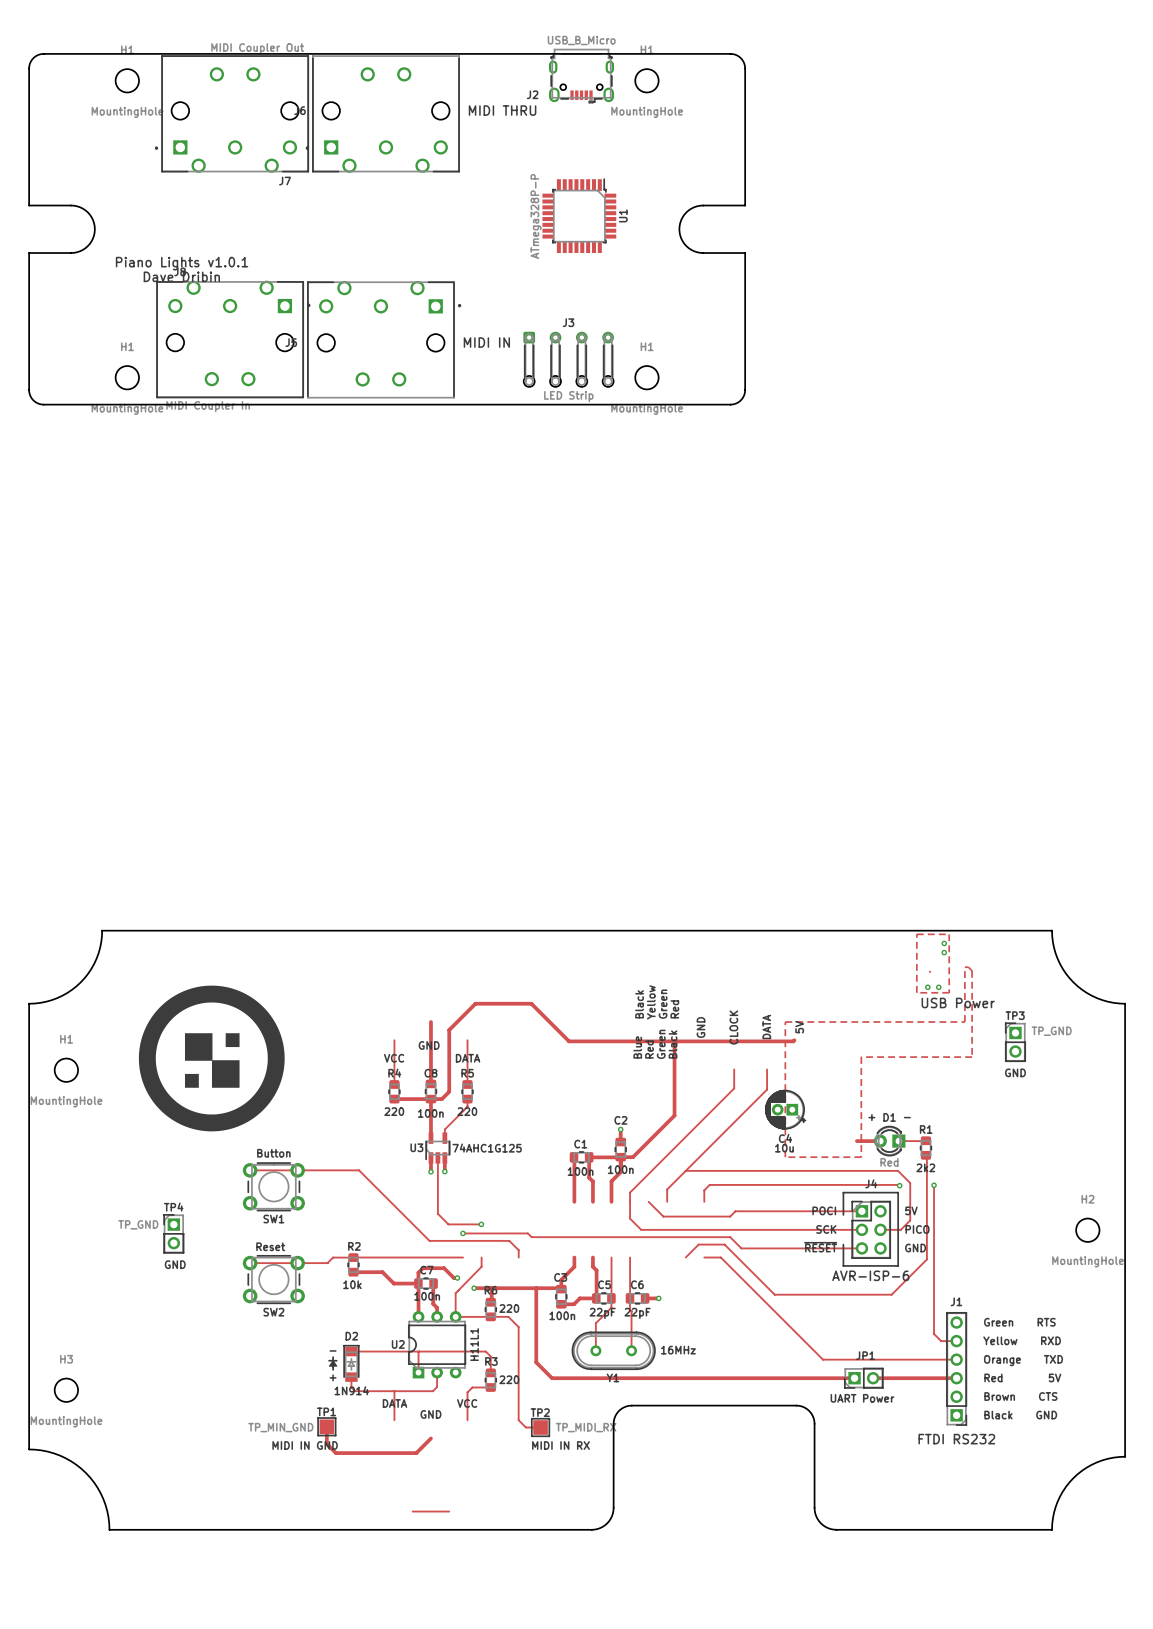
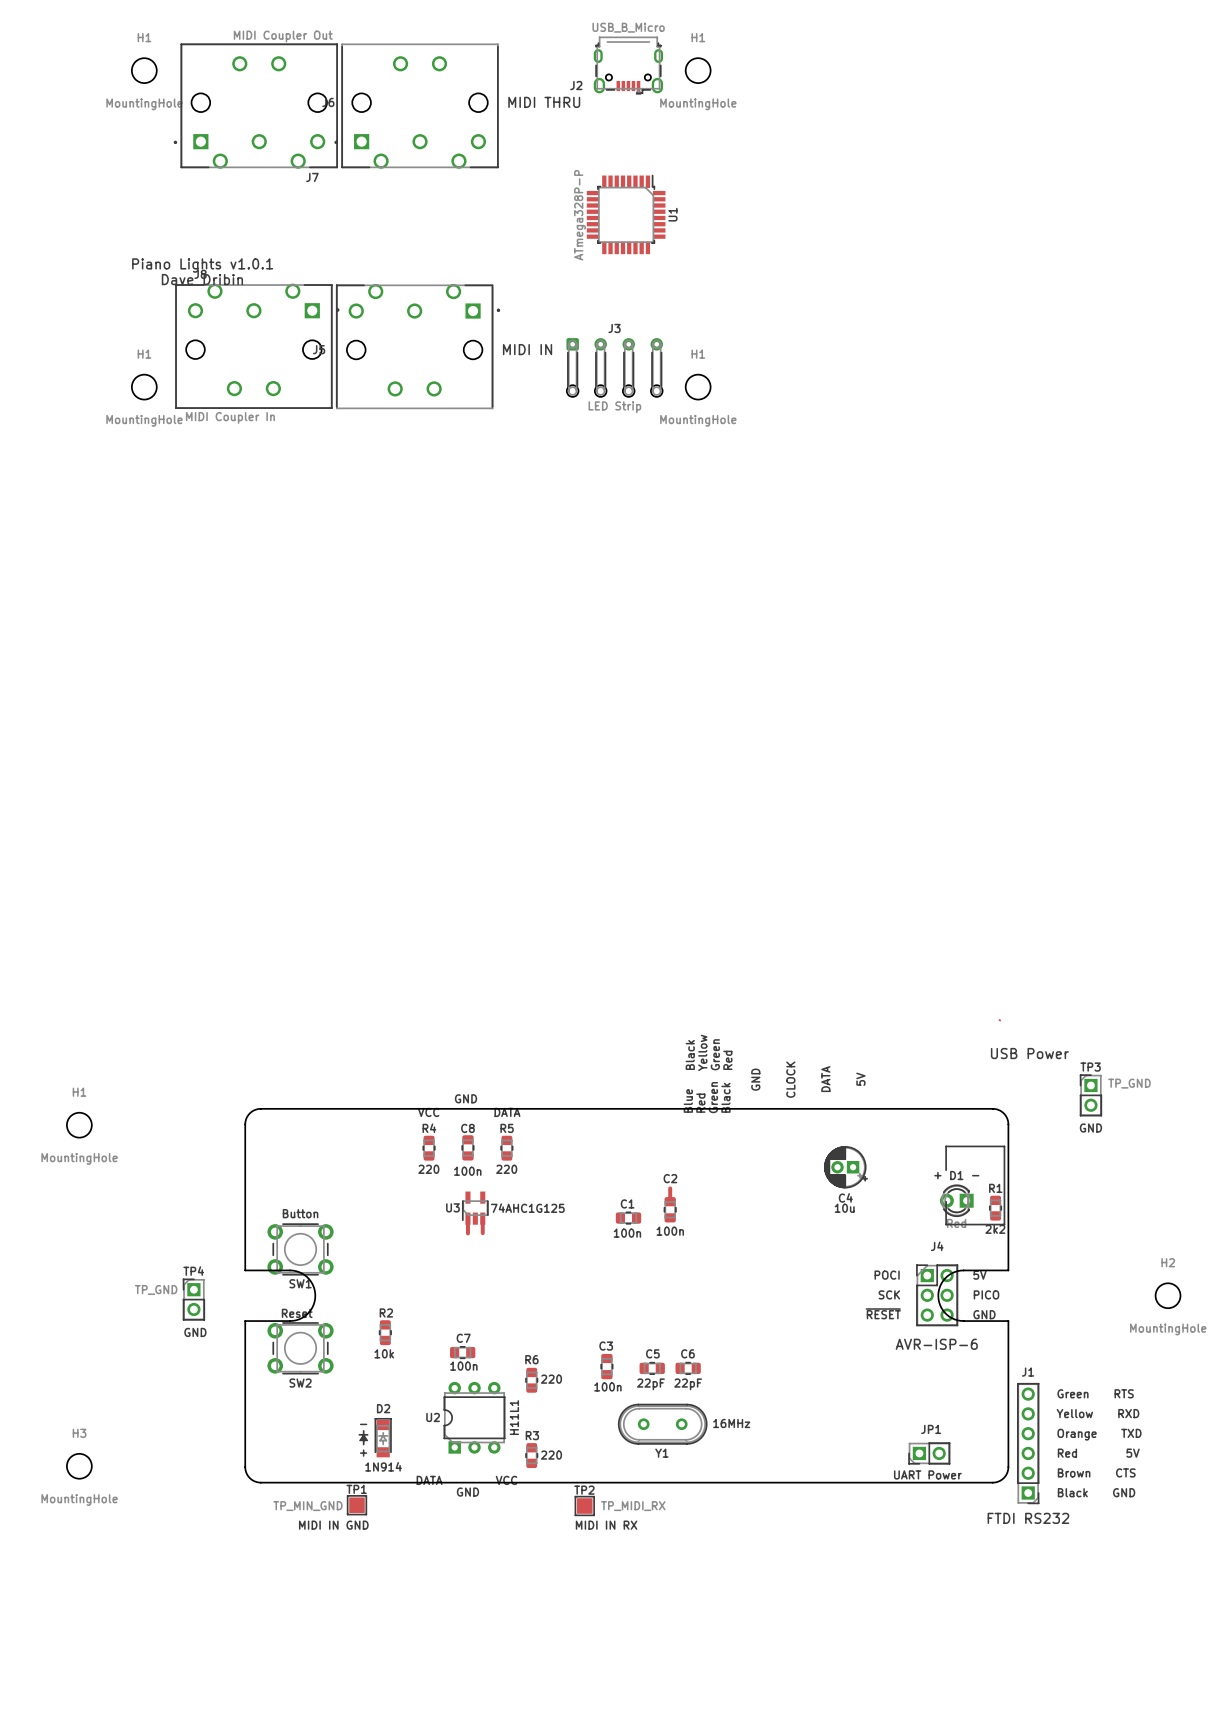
board edge: (43, 53) (736, 55) (742, 60) (745, 68) (745, 205) (694, 207) (684, 214) (679, 229) (684, 243) (694, 251) (745, 253) (743, 396) (738, 402) (730, 404) (37, 403) (31, 397) (29, 390) (29, 253) (80, 251) (89, 243) (94, 229) (89, 214) (80, 207) (29, 205) (29, 66) (33, 58) (43, 53) -> none
zone outline: (916, 934) (916, 992) (949, 992) (949, 934) (916, 934) -> none
via: (944, 943) -> none
via: (944, 952) -> none
zone outline: (964, 967) (964, 1022) (785, 1022) (785, 1157) (861, 1157) (861, 1057) (972, 1057) (972, 970) (968, 967) (964, 967) -> none
drawing: [138, 985, 285, 1132] -> none
via: (927, 987) -> none
via: (938, 987) -> none
track: (430, 1022) (430, 1083) -> none
track: (394, 1040) (394, 1084) -> none
track: (467, 1040) (467, 1084) -> none
track: (794, 1040) (569, 1041) (531, 1003) (475, 1003) (449, 1030) (449, 1091) -> none
track: (674, 1041) (674, 1115) (632, 1157) (620, 1157) -> none
track: (734, 1069) (734, 1088) (630, 1192) (630, 1218) (641, 1229) (861, 1229) -> none
track: (767, 1069) (767, 1089) (667, 1189) (667, 1201) -> none
track: (449, 1091) (441, 1099) (394, 1099) -> none
track: (430, 1099) (430, 1138) -> none
track: (467, 1099) (467, 1106) (444, 1129) (444, 1138) -> none
via: (620, 1129) -> none
track: (925, 1140) (898, 1141) -> none
track: (856, 1141) (880, 1141) -> none
track: (925, 1155) (926, 1259) (891, 1294) (774, 1294) (724, 1244) (698, 1244) (685, 1257) -> none
track: (437, 1157) (437, 1213) (448, 1224) (481, 1224) -> none
track: (574, 1157) (574, 1201) -> none
track: (620, 1157) (620, 1172) (611, 1181) (611, 1201) -> none
track: (620, 1157) (589, 1157) (589, 1177) (592, 1181) (592, 1201) -> none
track: (250, 1170) (359, 1170) (429, 1240) (509, 1240) (518, 1250) (518, 1257) -> none
track: (685, 1170) (898, 1170) (910, 1183) (910, 1220) (900, 1229) (880, 1229) -> none
via: (430, 1171) -> none
via: (444, 1171) -> none
track: (899, 1185) (709, 1184) (704, 1190) (704, 1201) -> none
via: (899, 1185) -> none
track: (934, 1185) (934, 1333) (941, 1341) (956, 1341) -> none
via: (934, 1185) -> none
track: (648, 1201) (663, 1216) (730, 1216) (735, 1211) (861, 1211) -> none
line: (843, 1214) (843, 1192) (898, 1192) (898, 1265) (843, 1265) (843, 1244) -> (946, 1170) (946, 1146) (1004, 1146) (1004, 1224) (946, 1224) (946, 1201)
via: (481, 1224) -> none
track: (462, 1233) (527, 1233) (531, 1237) (730, 1237) (741, 1248) (861, 1248) -> none
via: (462, 1233) -> none
track: (353, 1257) (463, 1257) -> none
track: (353, 1257) (333, 1257) (327, 1263) -> none
track: (481, 1257) (481, 1266) (455, 1293) (455, 1316) (490, 1316) -> none
track: (574, 1257) (574, 1266) (561, 1279) (561, 1289) (474, 1288) -> none
track: (592, 1257) (592, 1266) (596, 1270) (596, 1298) (579, 1298) (574, 1304) (561, 1304) -> none
track: (611, 1257) (611, 1298) -> none
track: (630, 1257) (630, 1298) -> none
track: (704, 1257) (720, 1257) (823, 1359) (956, 1359) -> none
track: (250, 1263) (327, 1263) -> none
track: (353, 1272) (382, 1272) (393, 1283) (418, 1283) -> none
track: (457, 1278) (453, 1278) (444, 1268) (422, 1268) (418, 1272) (418, 1283) -> none
via: (457, 1278) -> none
track: (418, 1283) (418, 1316) -> none
track: (433, 1283) (433, 1303) (437, 1307) (437, 1316) -> none
via: (474, 1288) -> none
track: (491, 1288) (490, 1302) -> none
track: (536, 1288) (536, 1362) (552, 1378) (854, 1378) -> none
track: (611, 1298) (611, 1307) (595, 1323) (595, 1350) -> none
track: (629, 1298) (631, 1350) -> none
track: (645, 1298) (658, 1298) -> none
via: (658, 1298) -> none
track: (490, 1316) (508, 1316) (518, 1327) (518, 1420) (525, 1427) (540, 1427) -> none
track: (351, 1351) (485, 1351) (490, 1356) (490, 1372) -> none
track: (419, 1351) (418, 1372) -> none
track: (437, 1372) (437, 1387) (432, 1391) (355, 1391) (351, 1387) -> none
track: (351, 1377) (351, 1387) -> none
track: (873, 1378) (956, 1378) -> none
track: (490, 1387) (472, 1387) (467, 1392) (467, 1420) -> none
track: (394, 1391) (394, 1420) -> none
board edge: (631, 1405) (620, 1409) (614, 1419) (613, 1510) (609, 1521) (597, 1529) (109, 1529) (103, 1499) (85, 1472) (59, 1455) (29, 1449) (29, 1003) (57, 998) (80, 982) (96, 958) (102, 930) (1052, 930) (1057, 958) (1073, 982) (1097, 998) (1125, 1003) (1125, 1456) (1097, 1462) (1073, 1478) (1057, 1501) (1052, 1529) (833, 1529) (820, 1523) (814, 1510) (813, 1417) (806, 1408) (796, 1405) -> (682, 1482) (260, 1482) (251, 1479) (246, 1473) (245, 1467) (245, 1321) (298, 1319) (310, 1310) (315, 1295) (310, 1281) (298, 1272) (245, 1270) (245, 1124) (248, 1114) (254, 1110) (260, 1108) (992, 1108) (1001, 1111) (1006, 1117) (1008, 1124) (1008, 1270) (954, 1272) (942, 1281) (938, 1295) (942, 1310) (954, 1319) (1008, 1321) (1007, 1472) (1002, 1479) (994, 1482) (857, 1482)
track: (326, 1426) (326, 1443) (335, 1453) (416, 1453) (430, 1438) -> none
track: (412, 1511) (449, 1511) -> none

